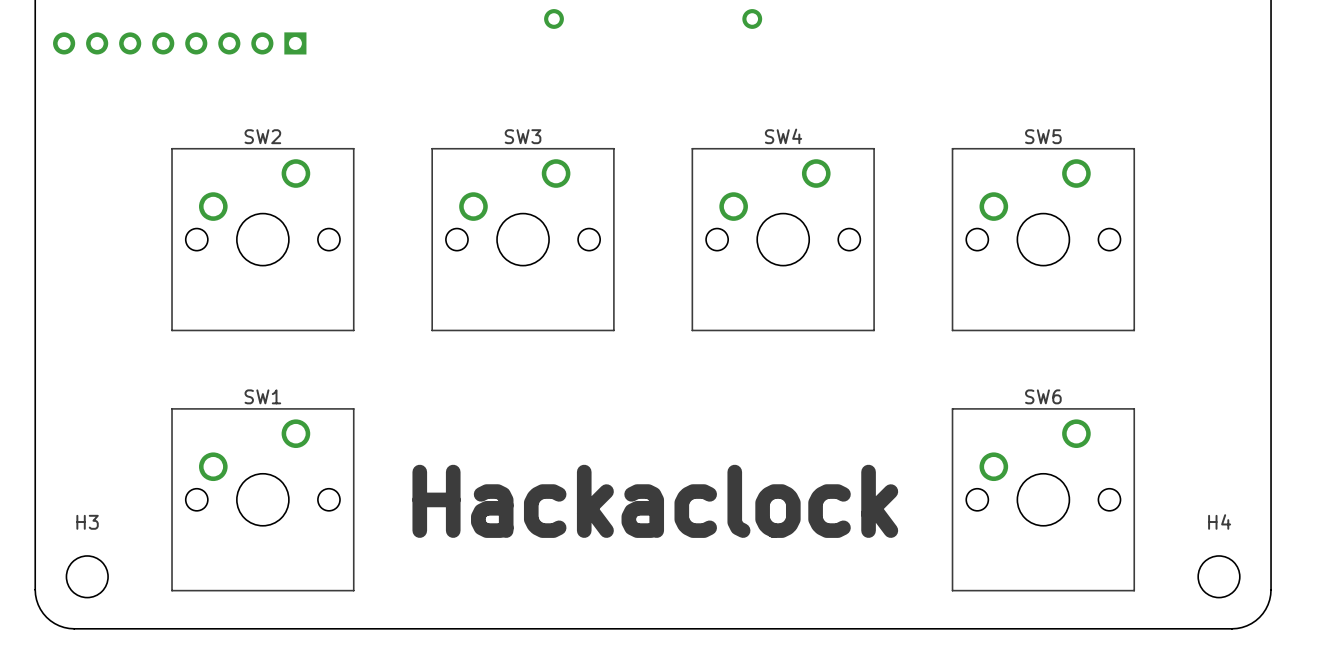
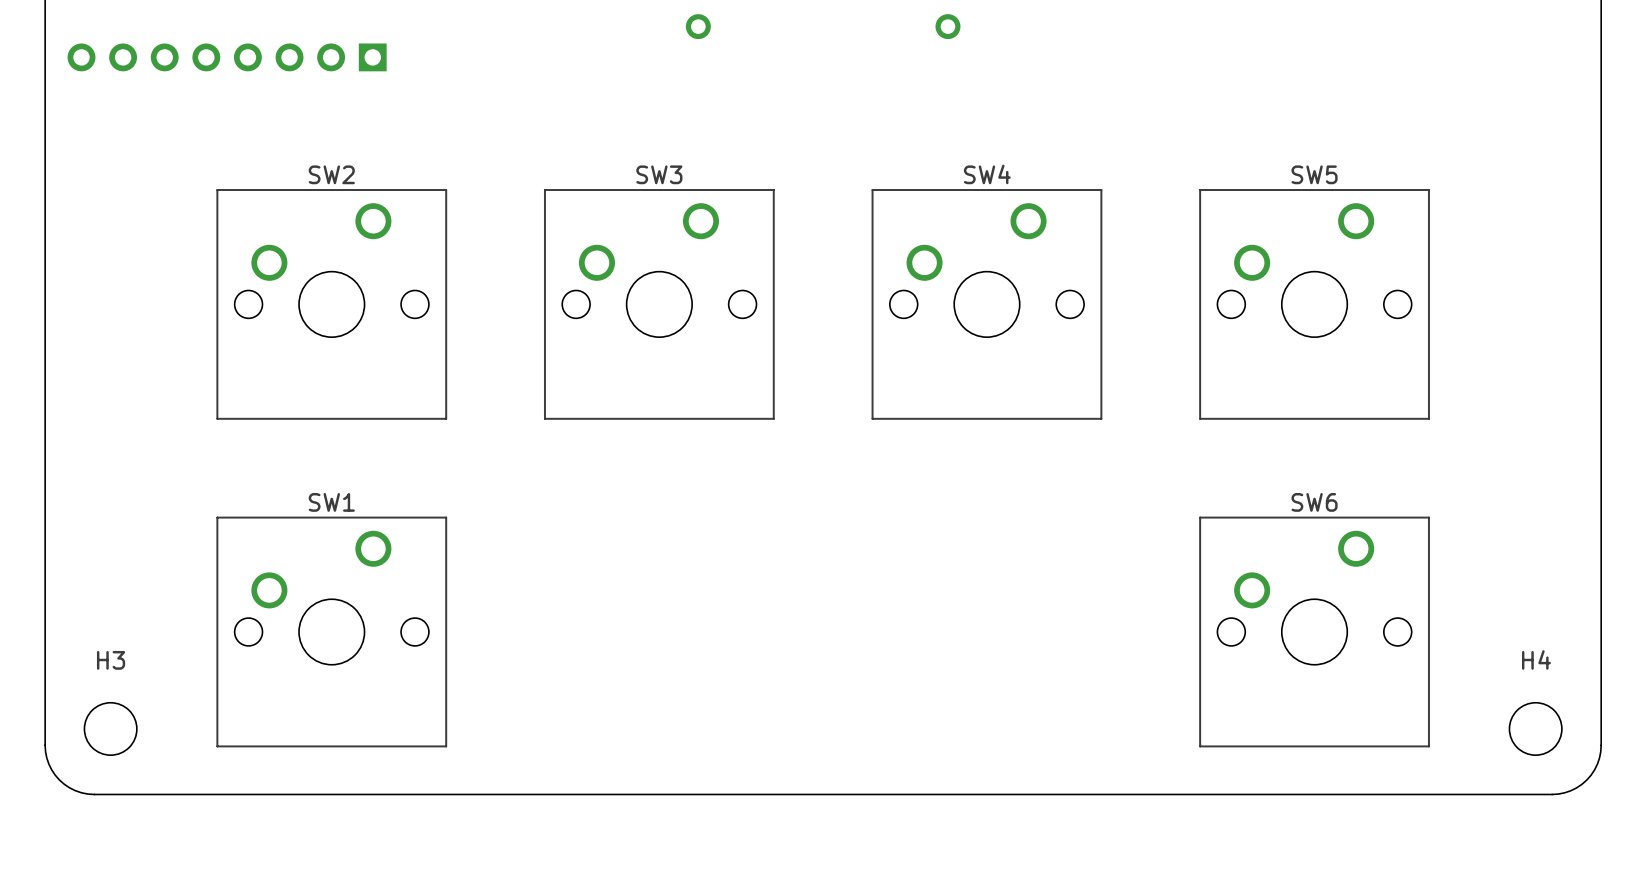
text: Hackaclock (655, 501) -> none

